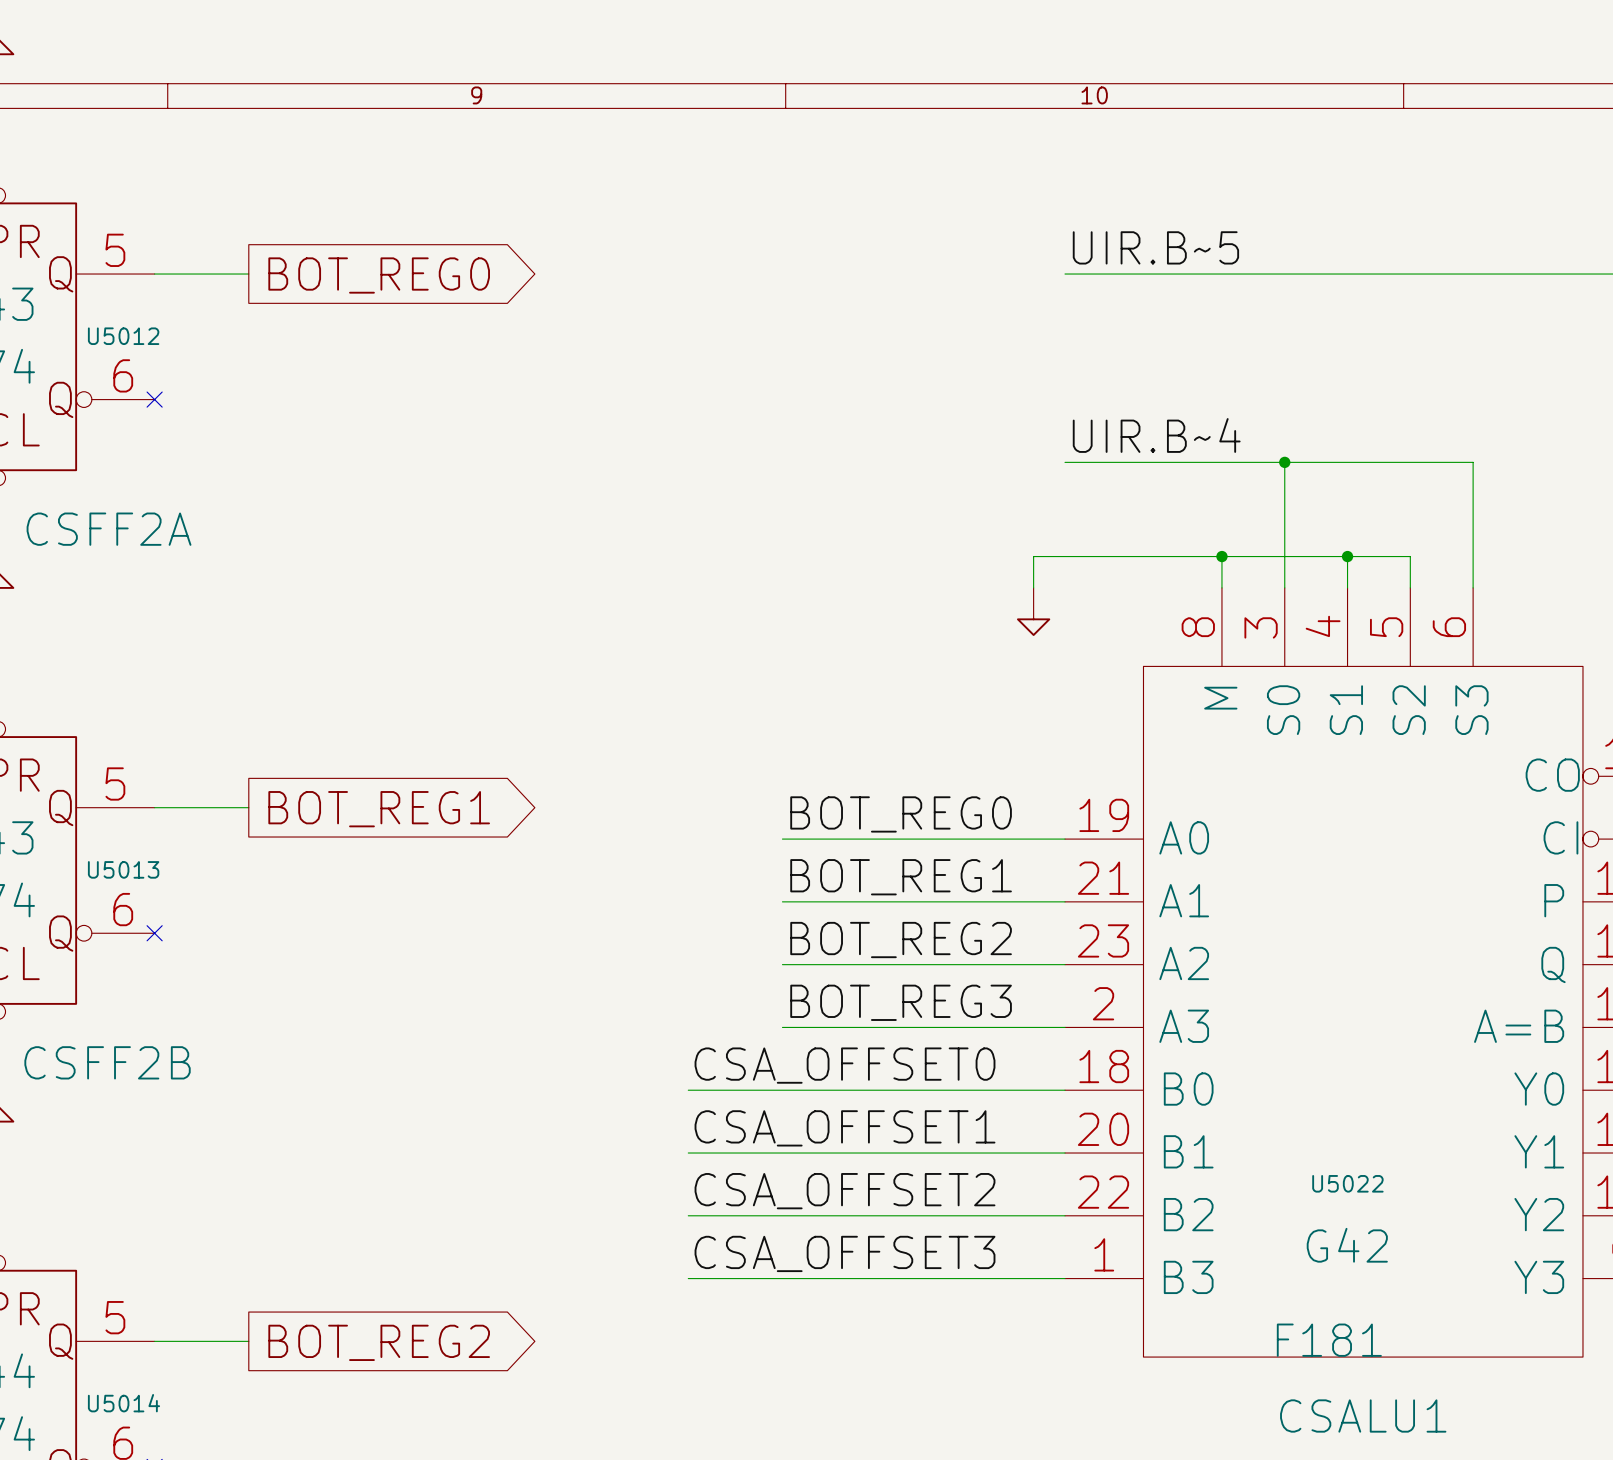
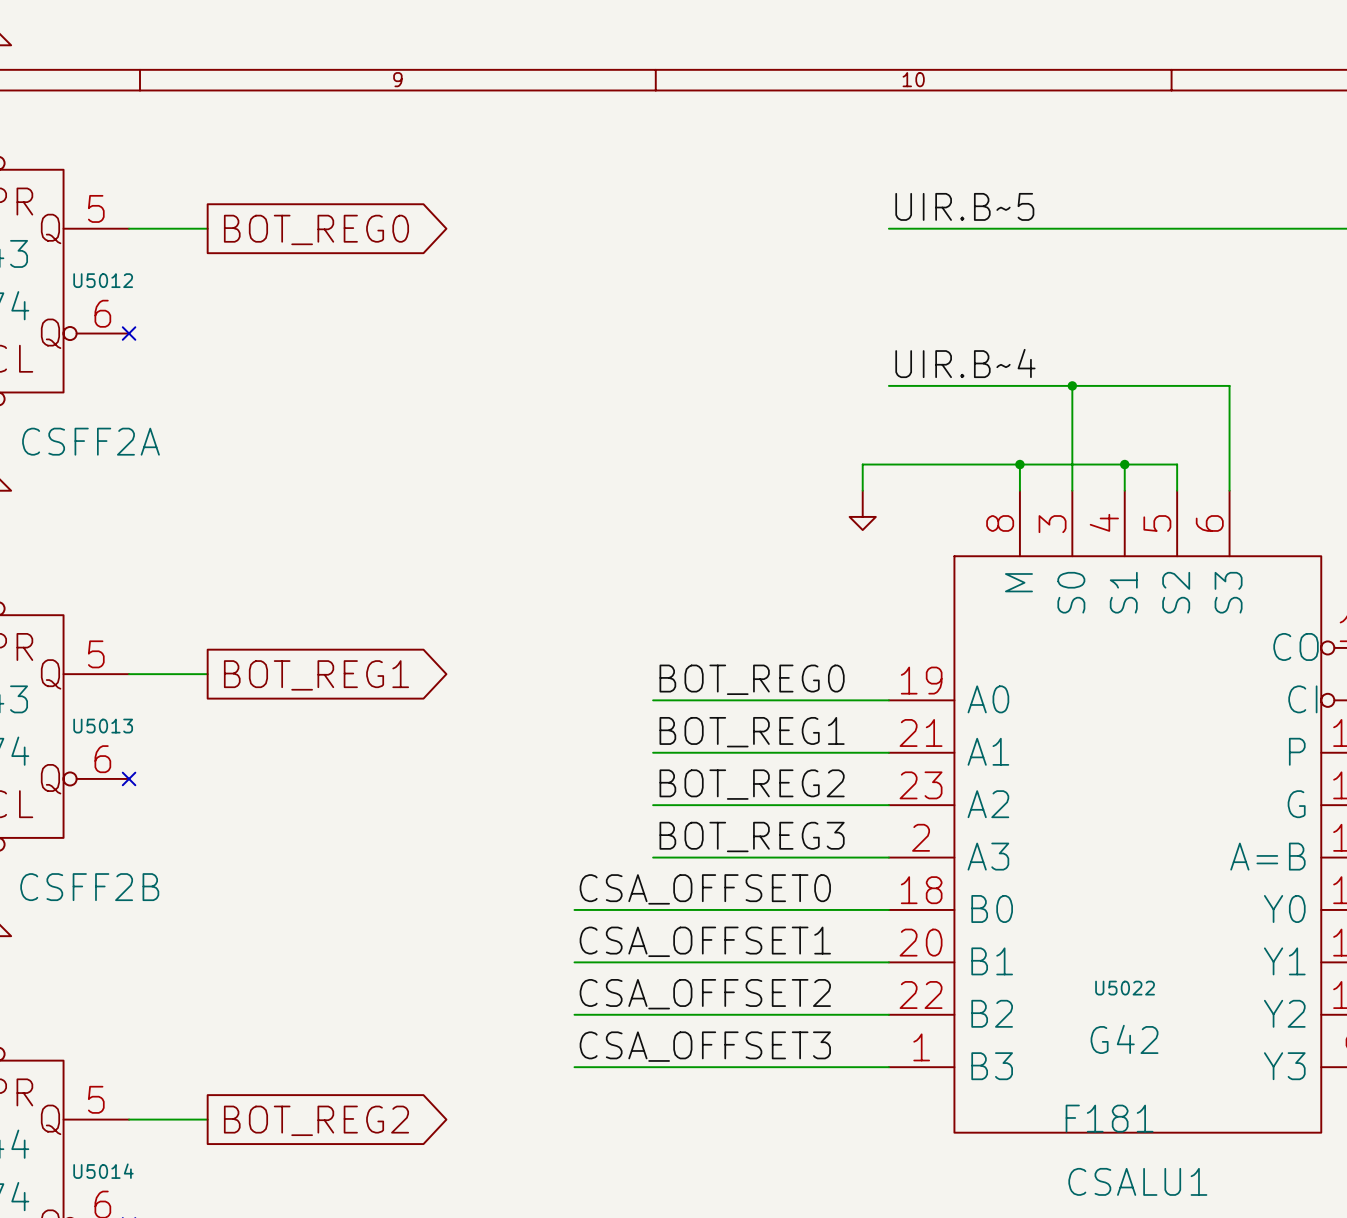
U5022 pin name: Q (1553, 964) -> G (1296, 804)

